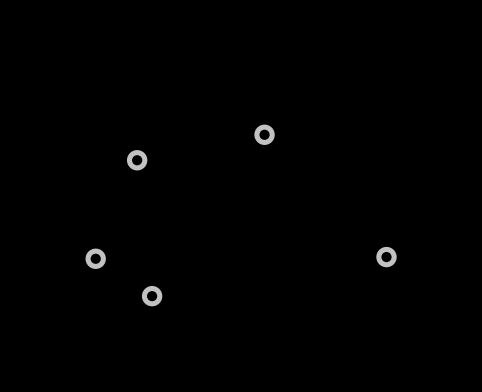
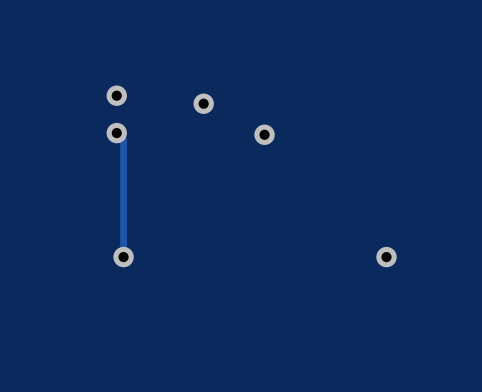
via: none -> (116, 95)
via: none -> (203, 103)
track: none -> (116, 133) (123, 139) (123, 257)
via: none -> (116, 133)
via: (137, 160) -> none
via: none -> (123, 257)
via: (95, 258) -> none
via: (152, 296) -> none

